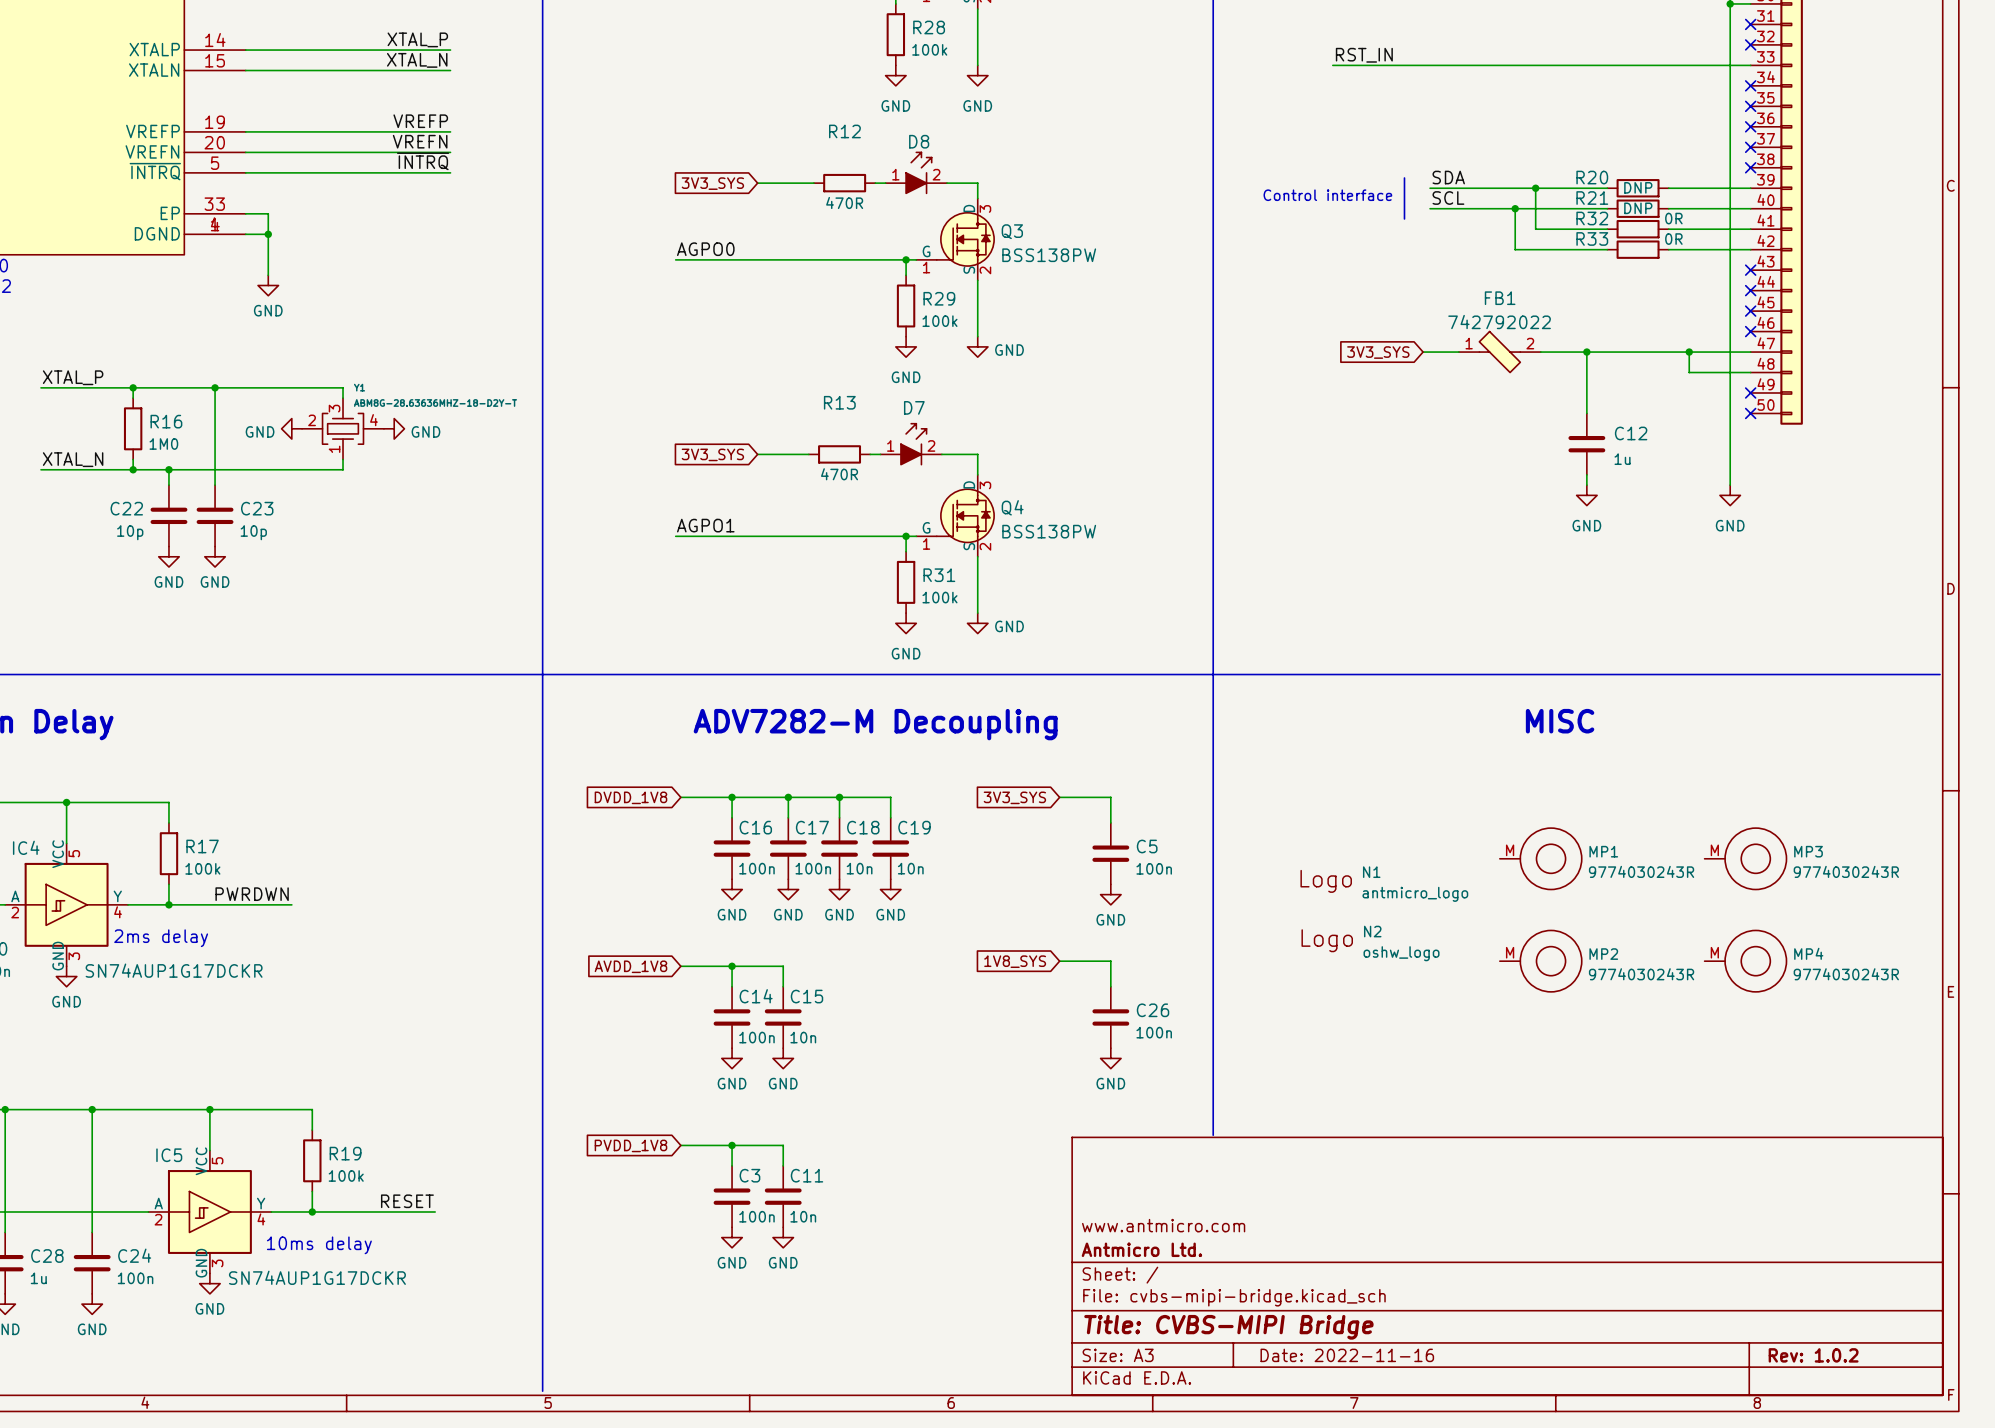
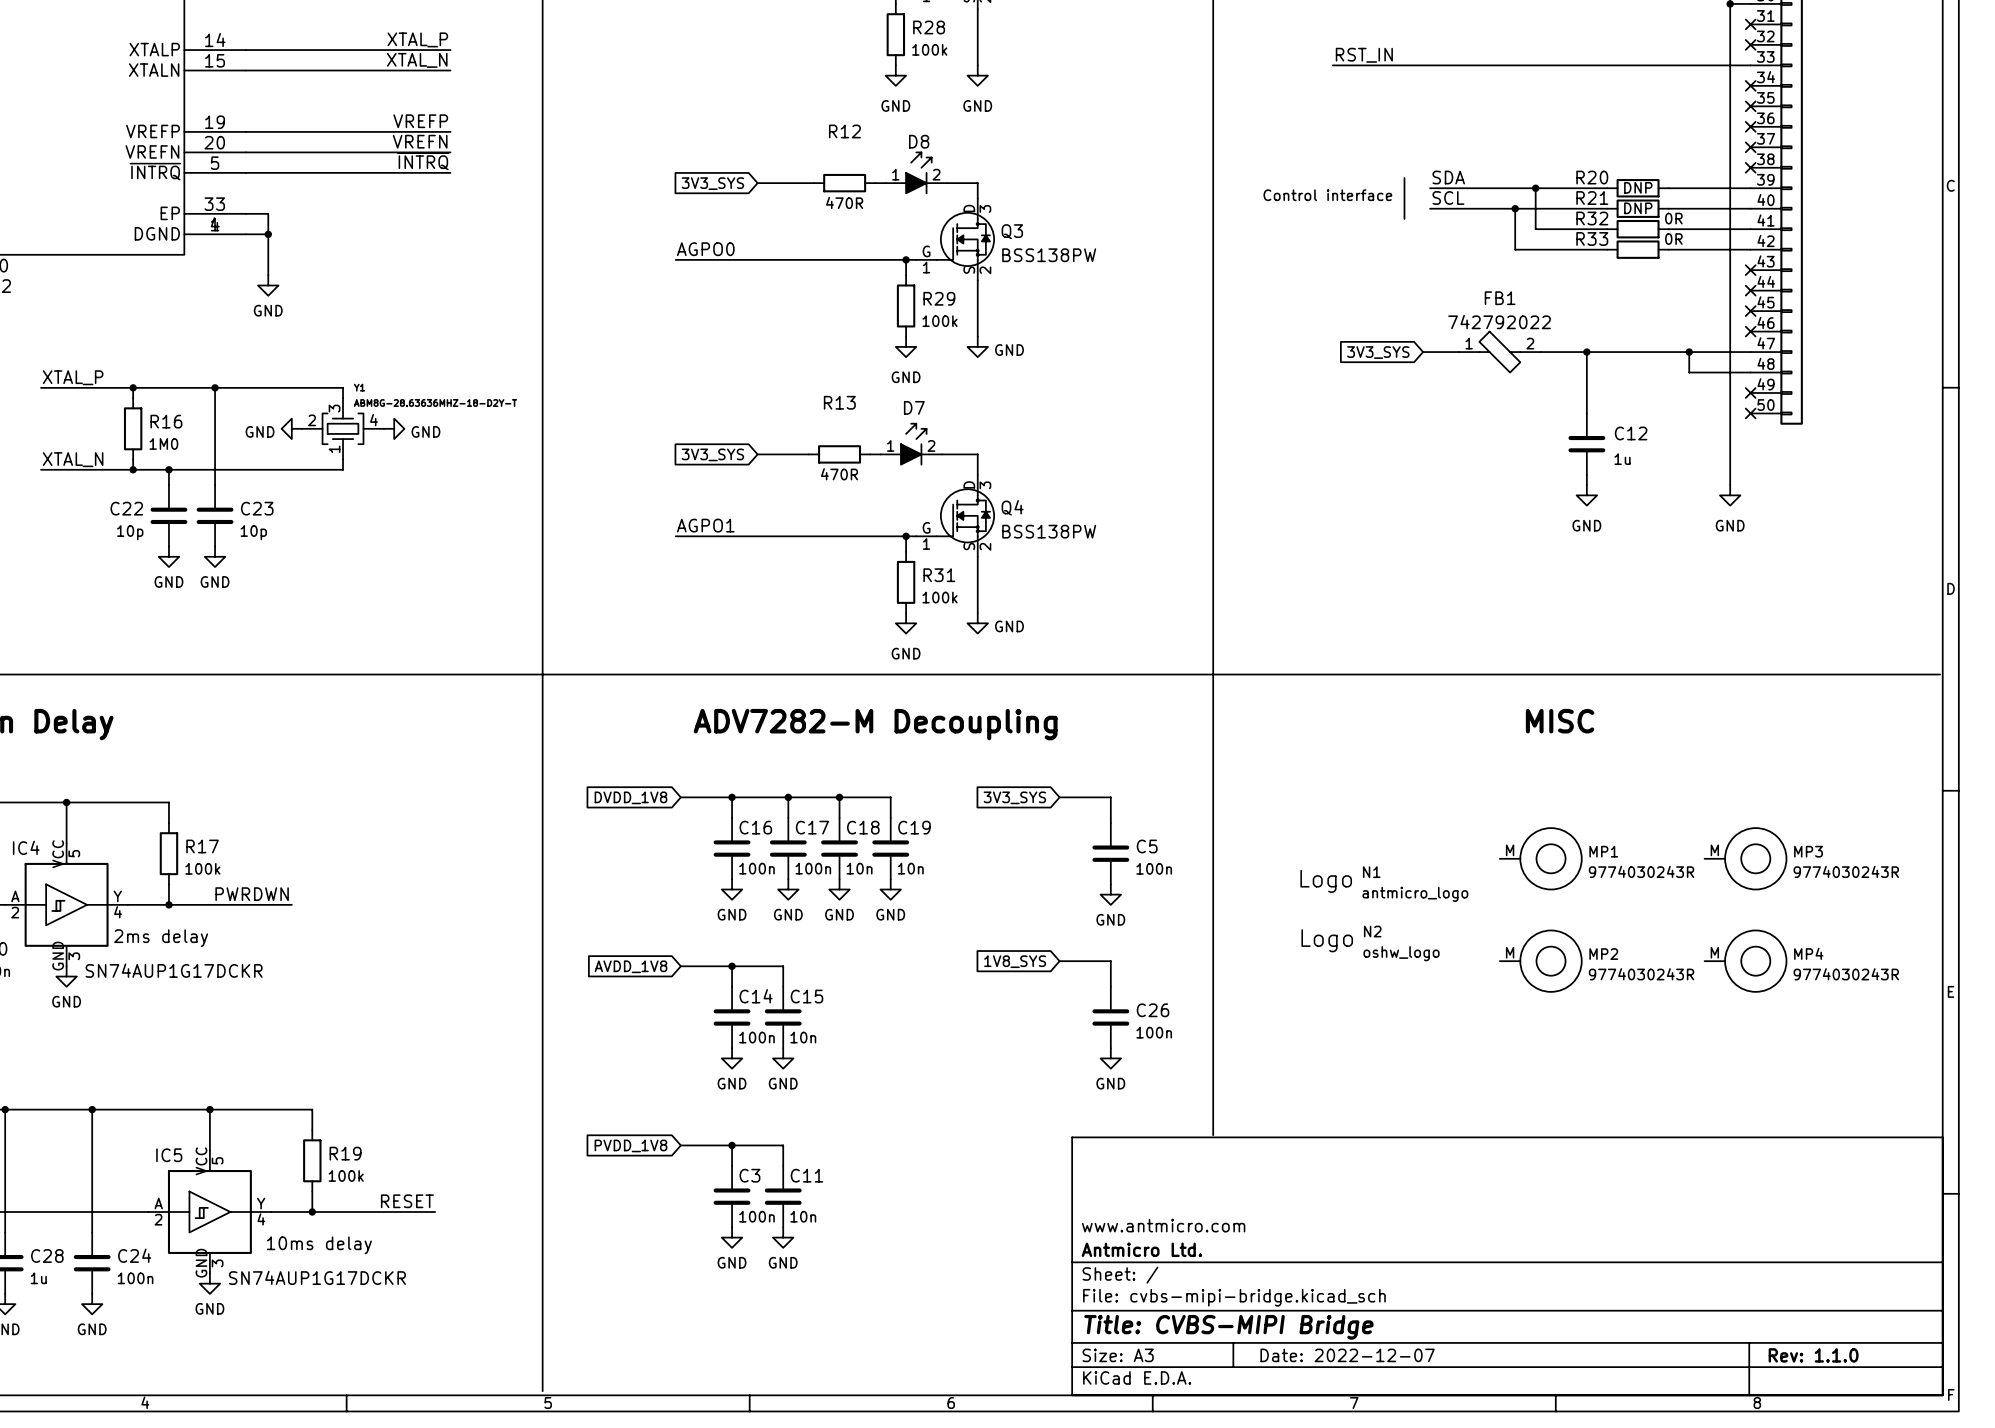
title block: Date: 2022-11-16 (1347, 1355) -> Date: 2022-12-07 (1347, 1355)
title block: Rev: 1.0.2 (1813, 1355) -> Rev: 1.1.0 (1813, 1355)

